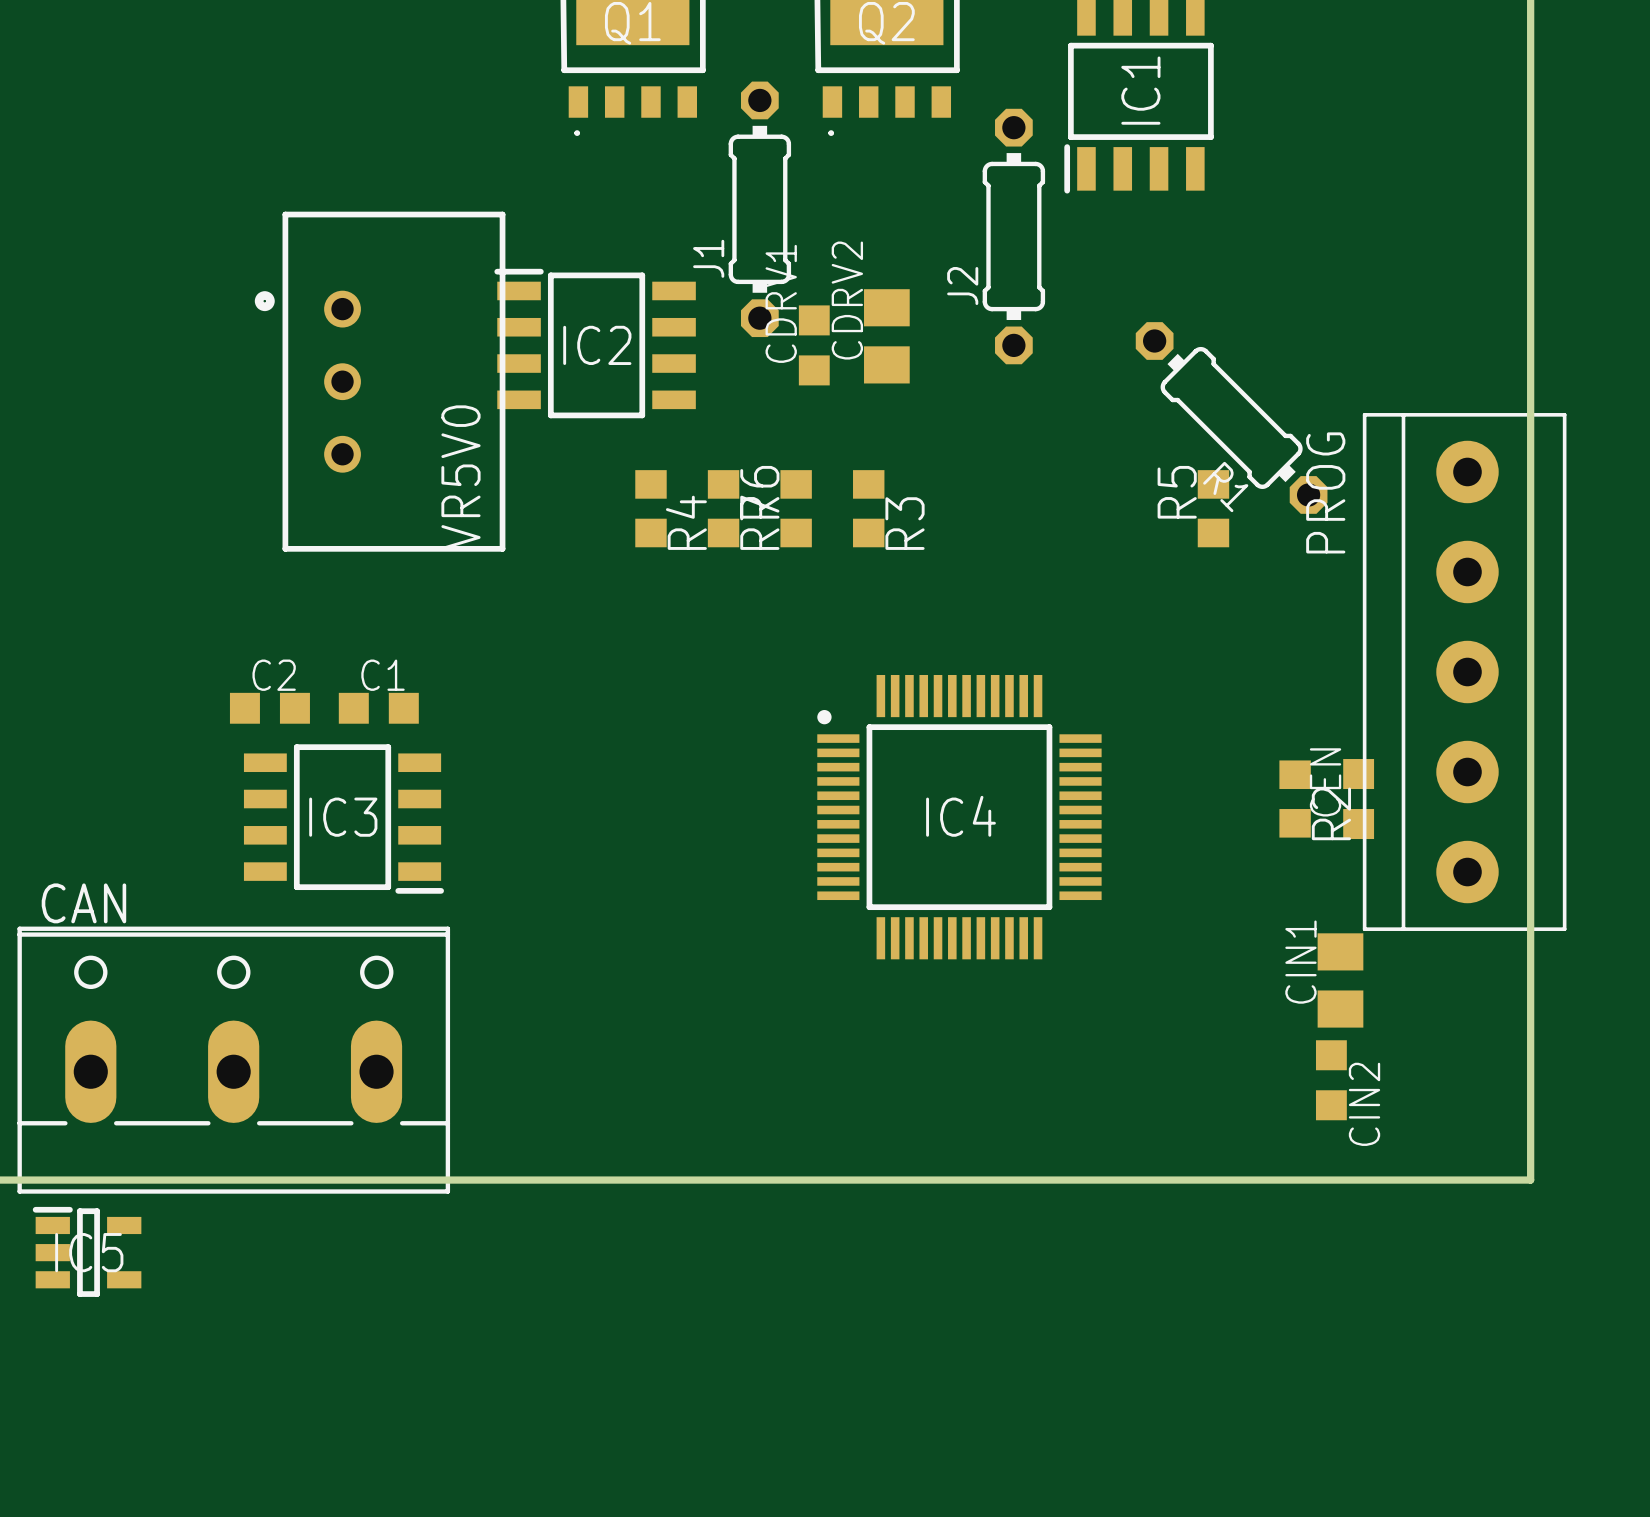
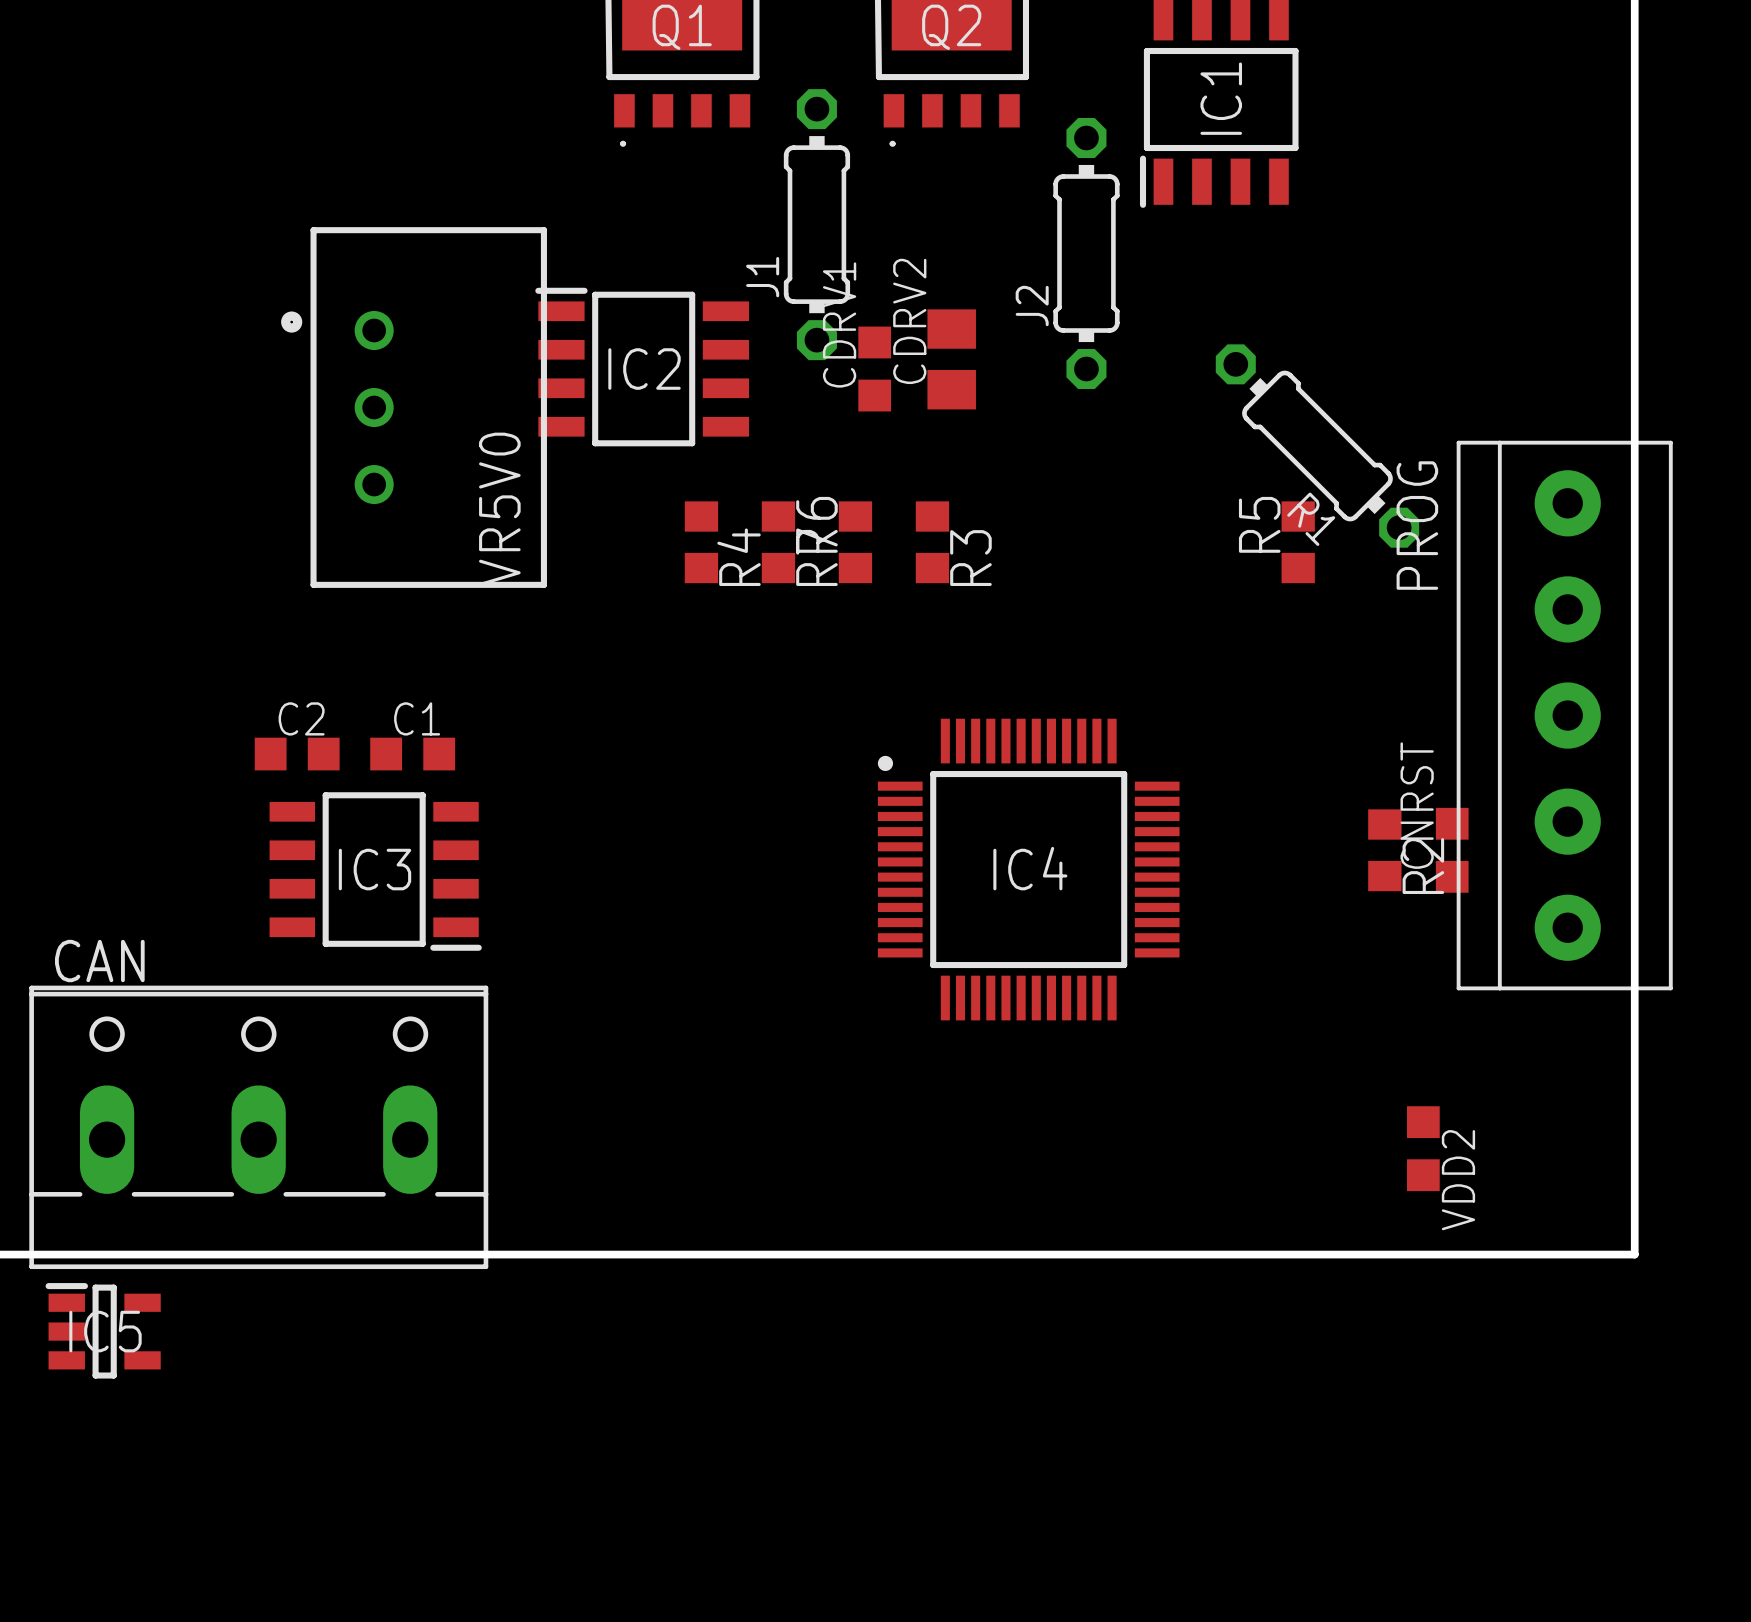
CEN name: CEN (1325, 782) -> CNRST (1417, 805)
CIN1: (1340, 980) -> none
CIN2 name: CIN2 (1364, 1104) -> VDD2 (1458, 1180)

